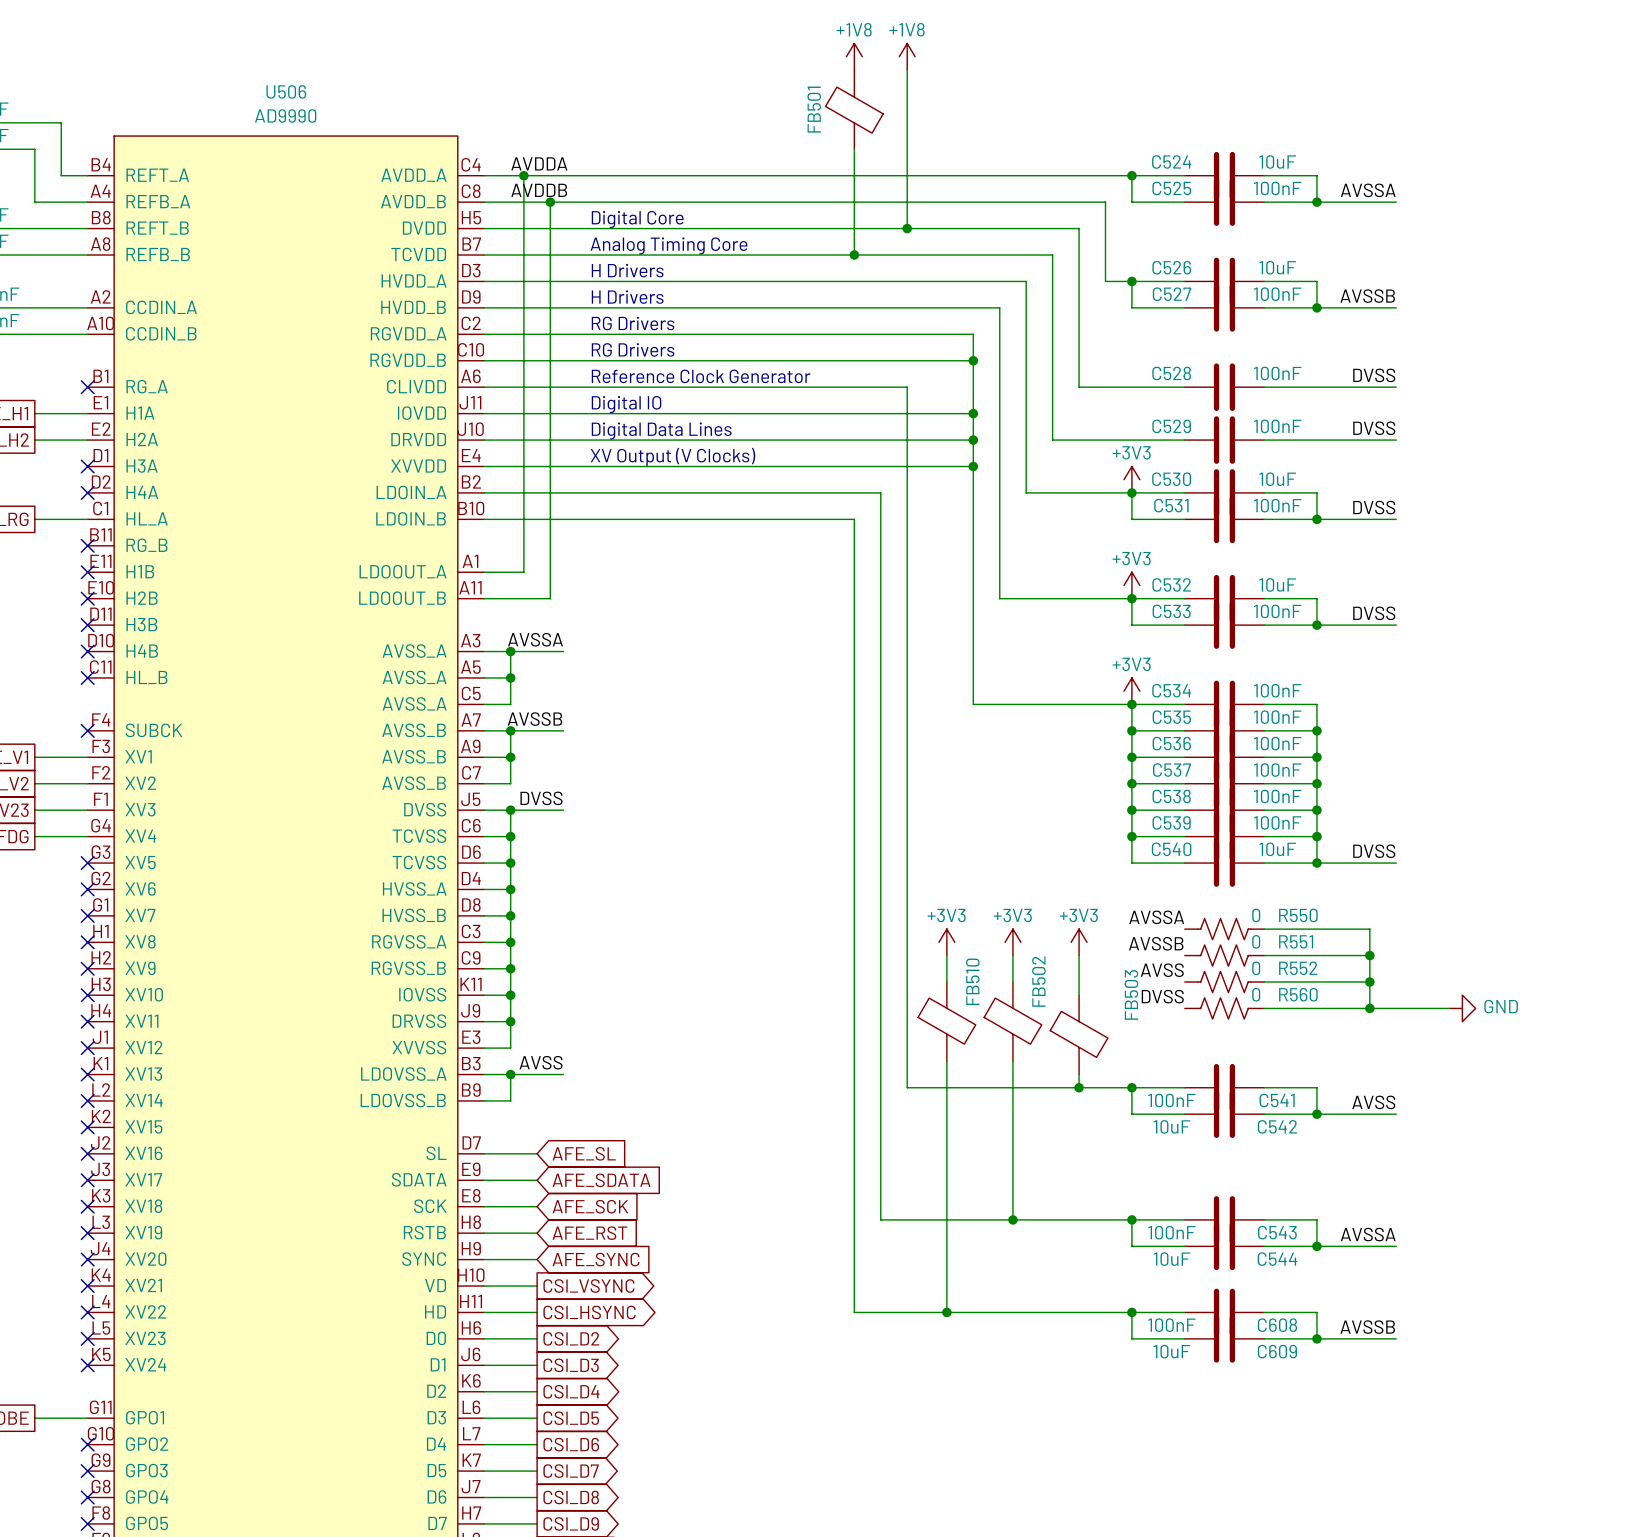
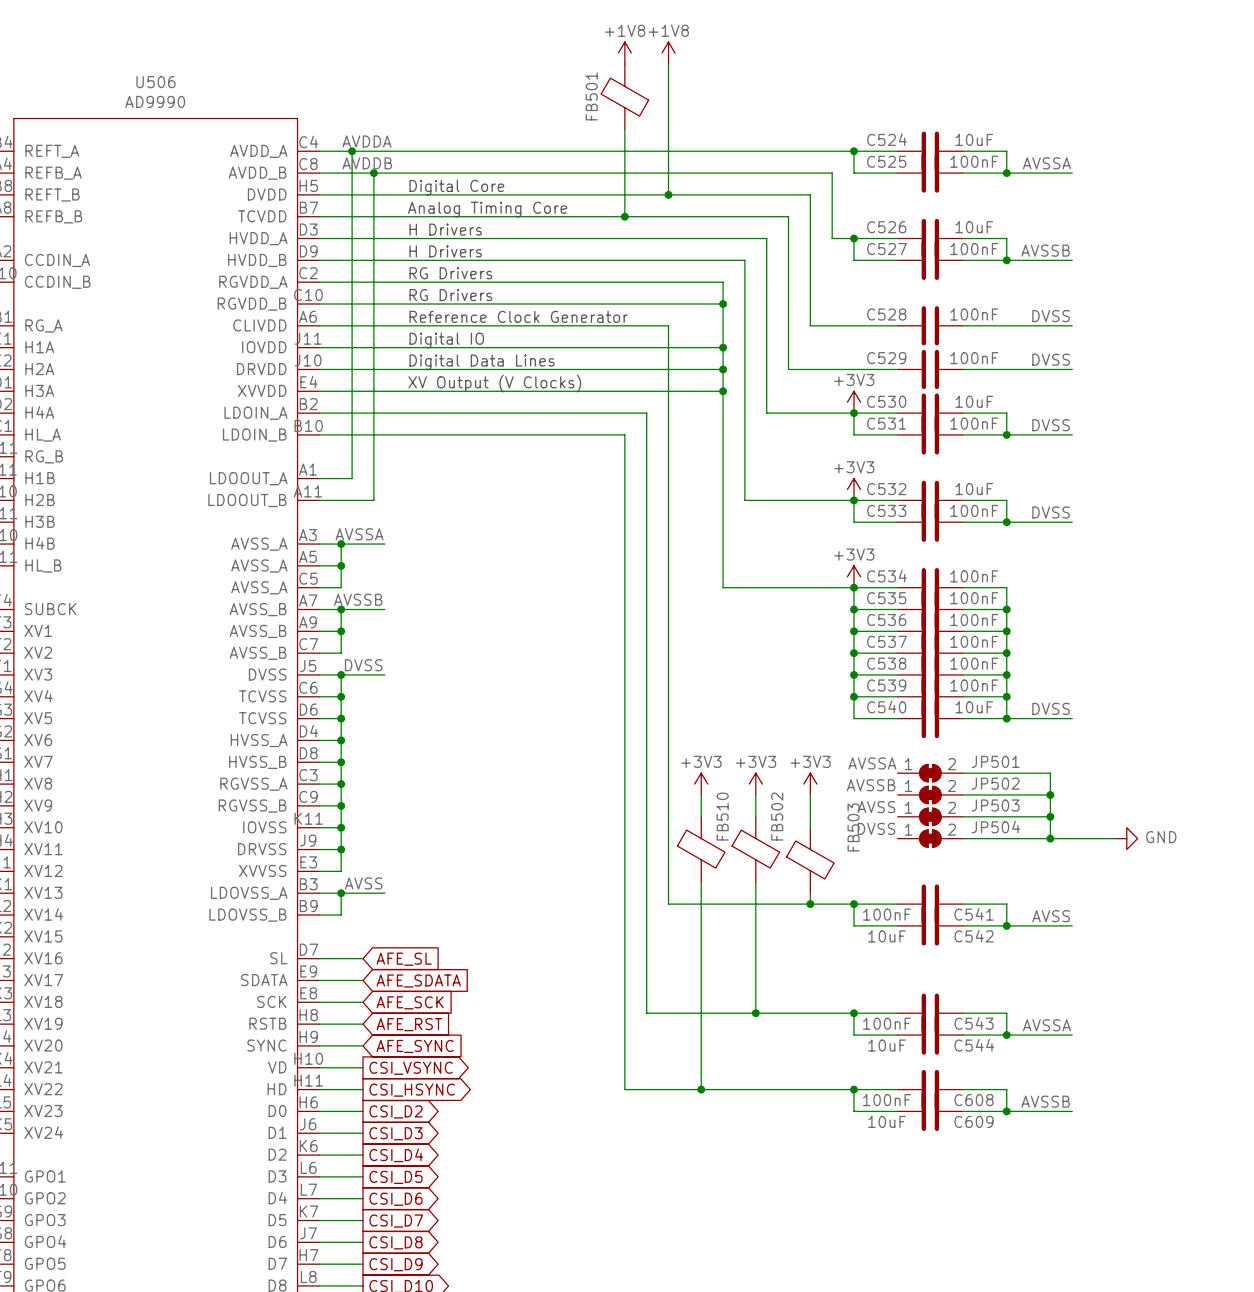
R550: 0 (1224, 929) -> none
JP501: none -> (930, 773)
R551: 0 (1224, 955) -> none
JP502: none -> (930, 794)
R552: 0 (1224, 982) -> none
JP503: none -> (930, 816)
R560: 0 (1224, 1008) -> none
JP504: none -> (930, 838)

